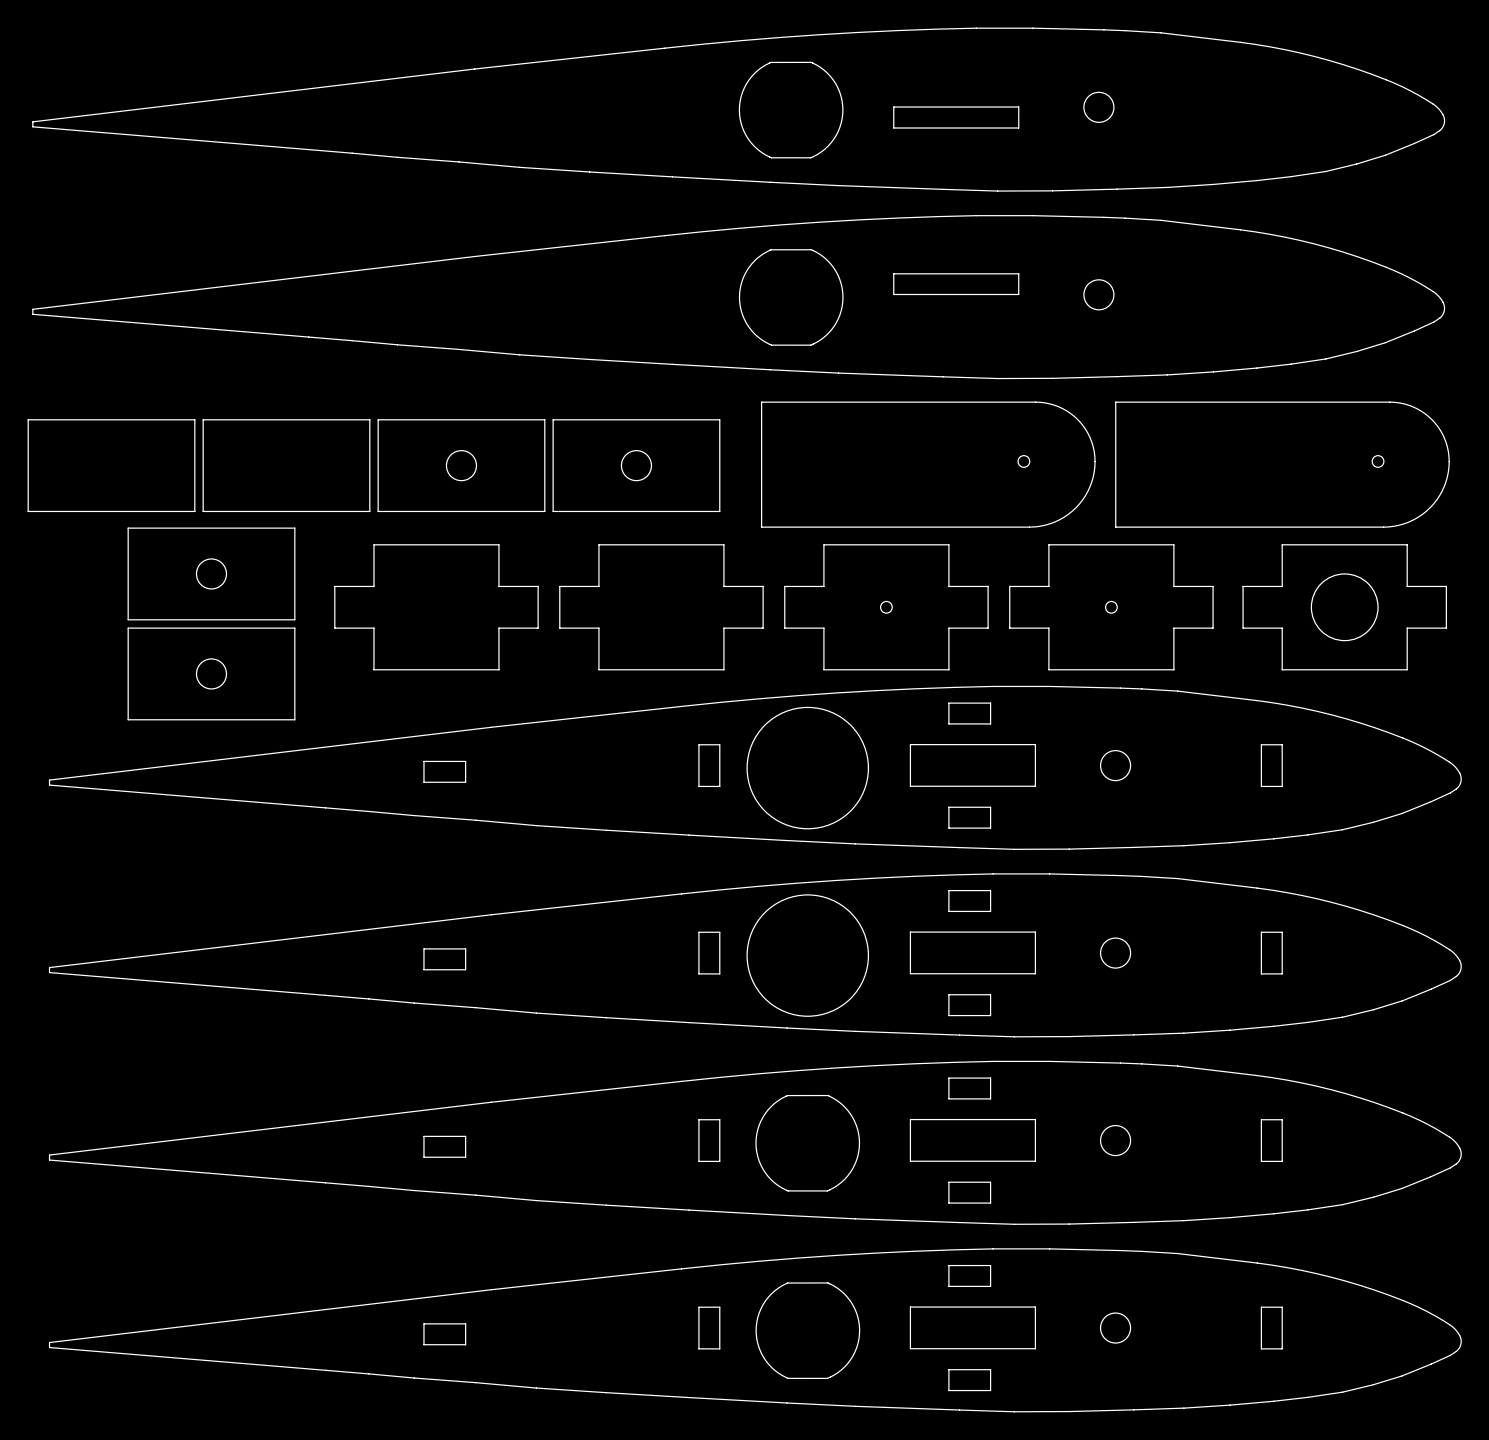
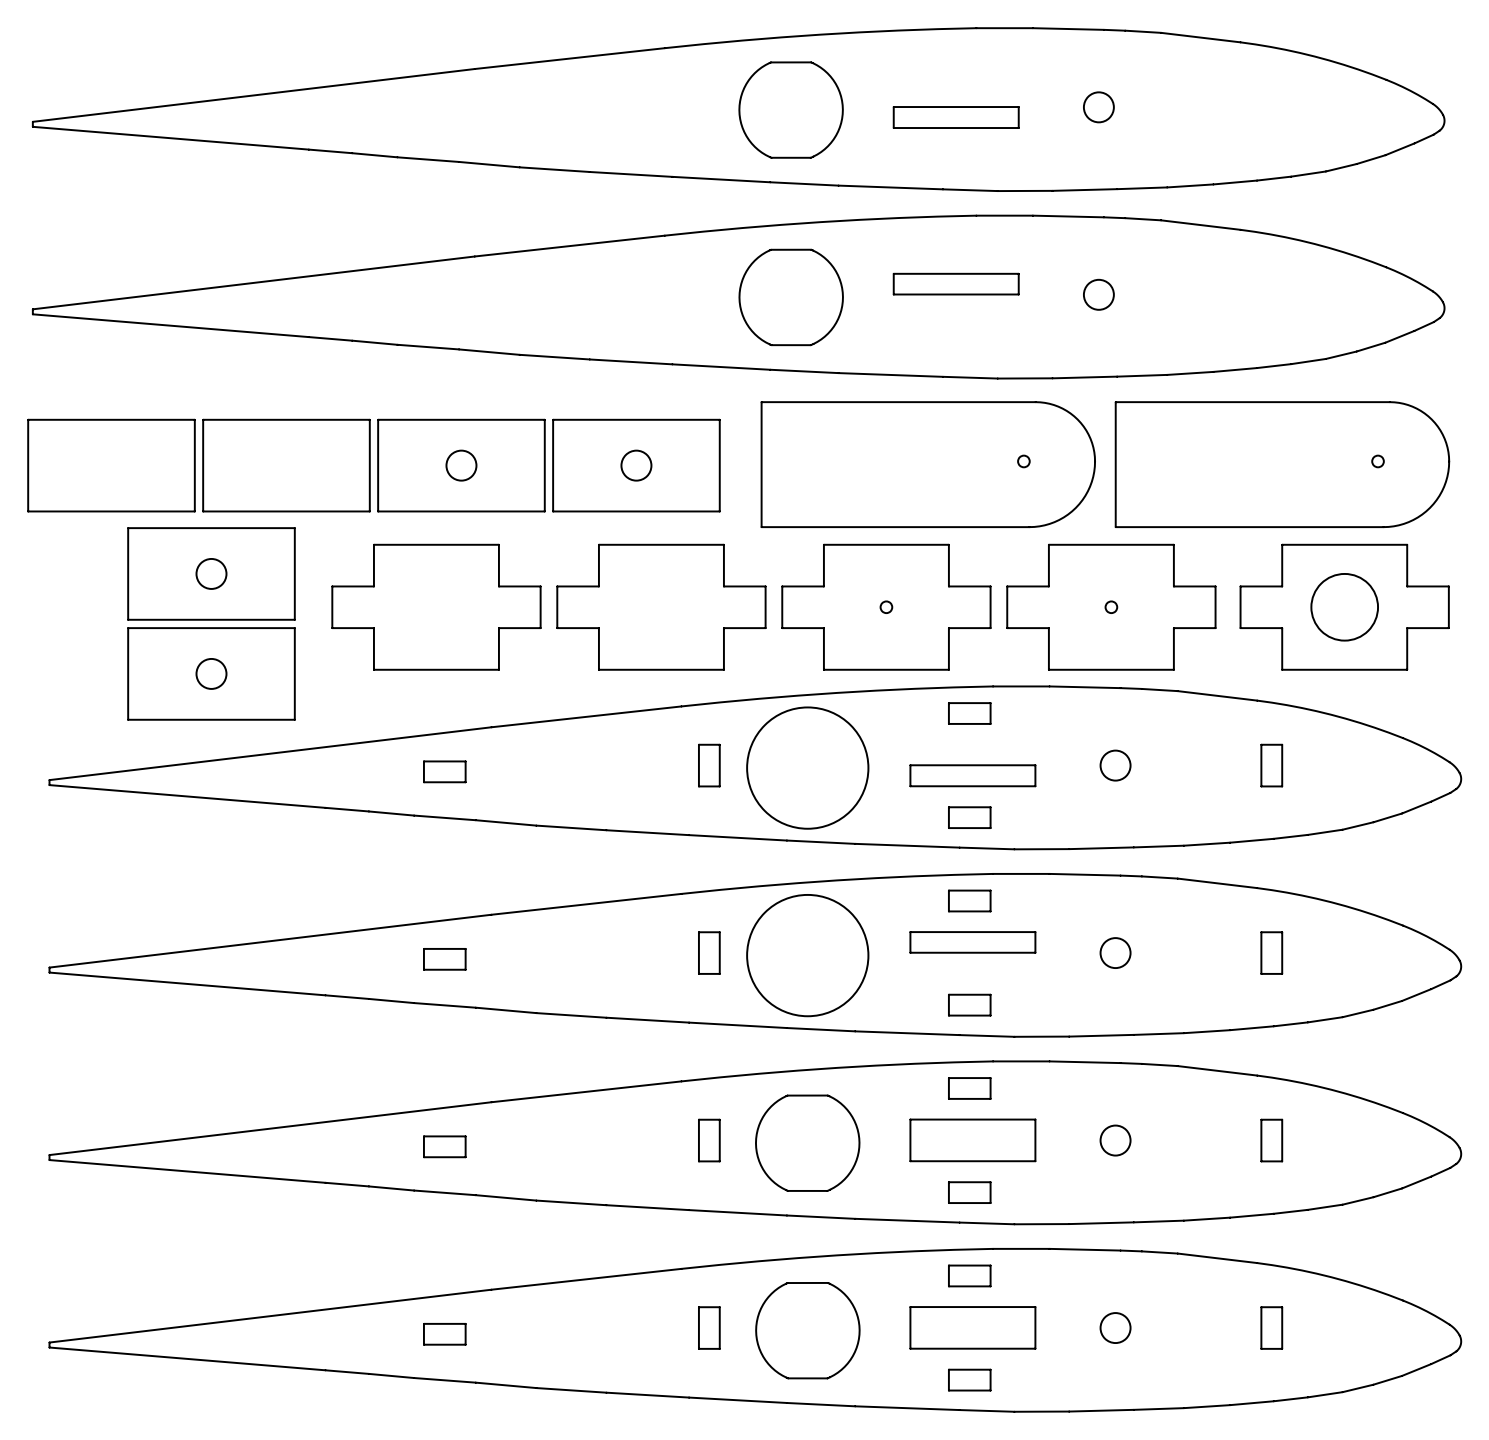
drawing shape: [27, 27, 1462, 1413] -> [27, 27, 1462, 1413]

